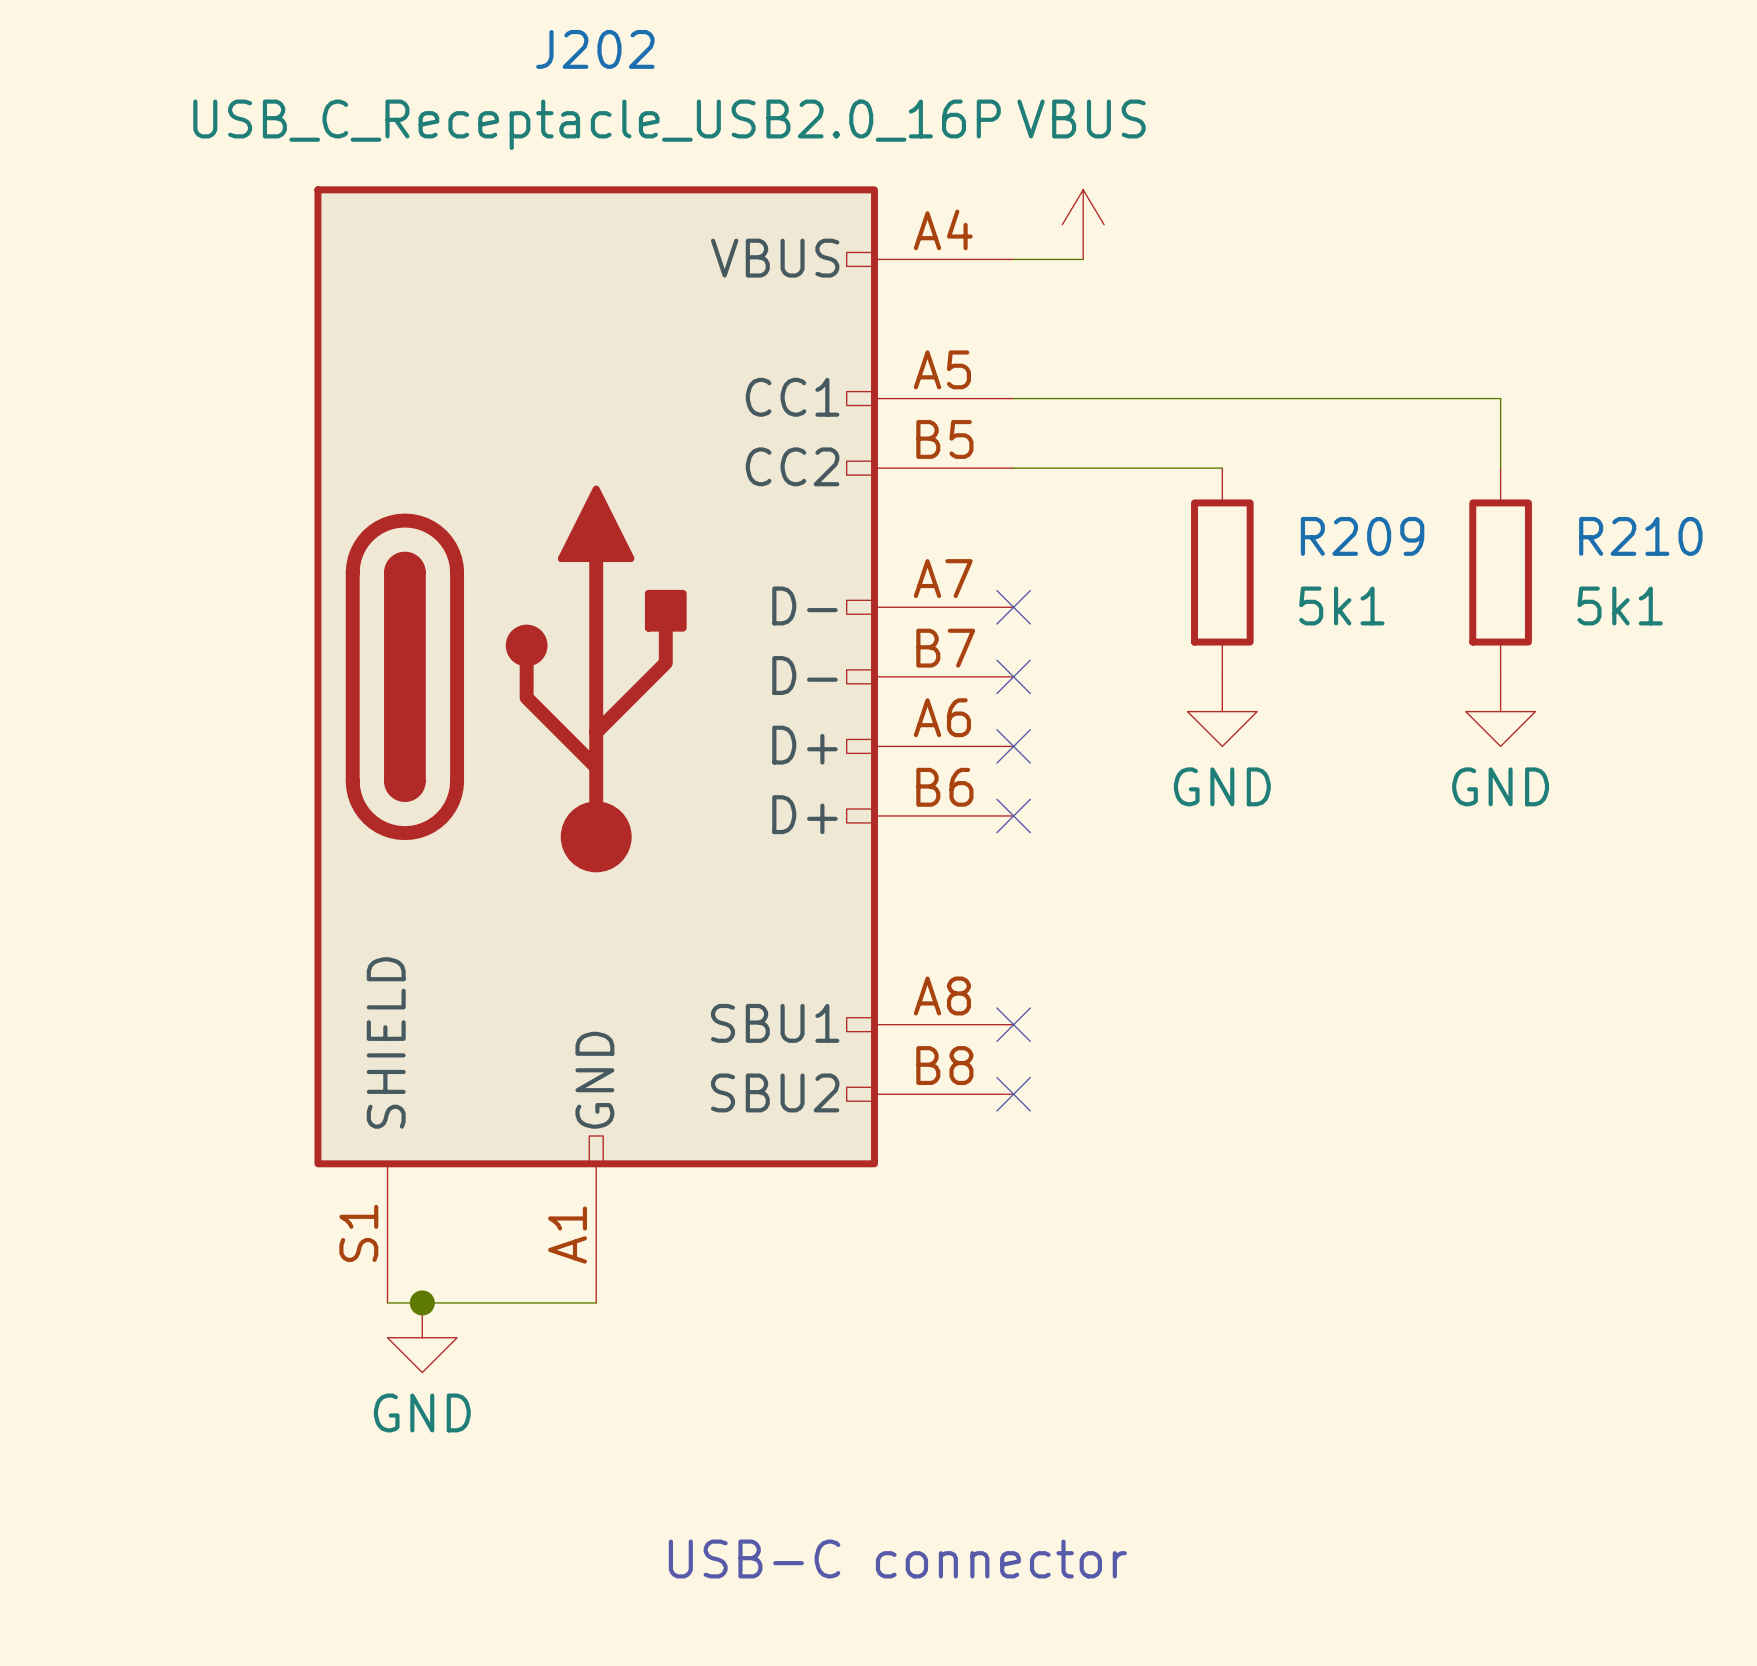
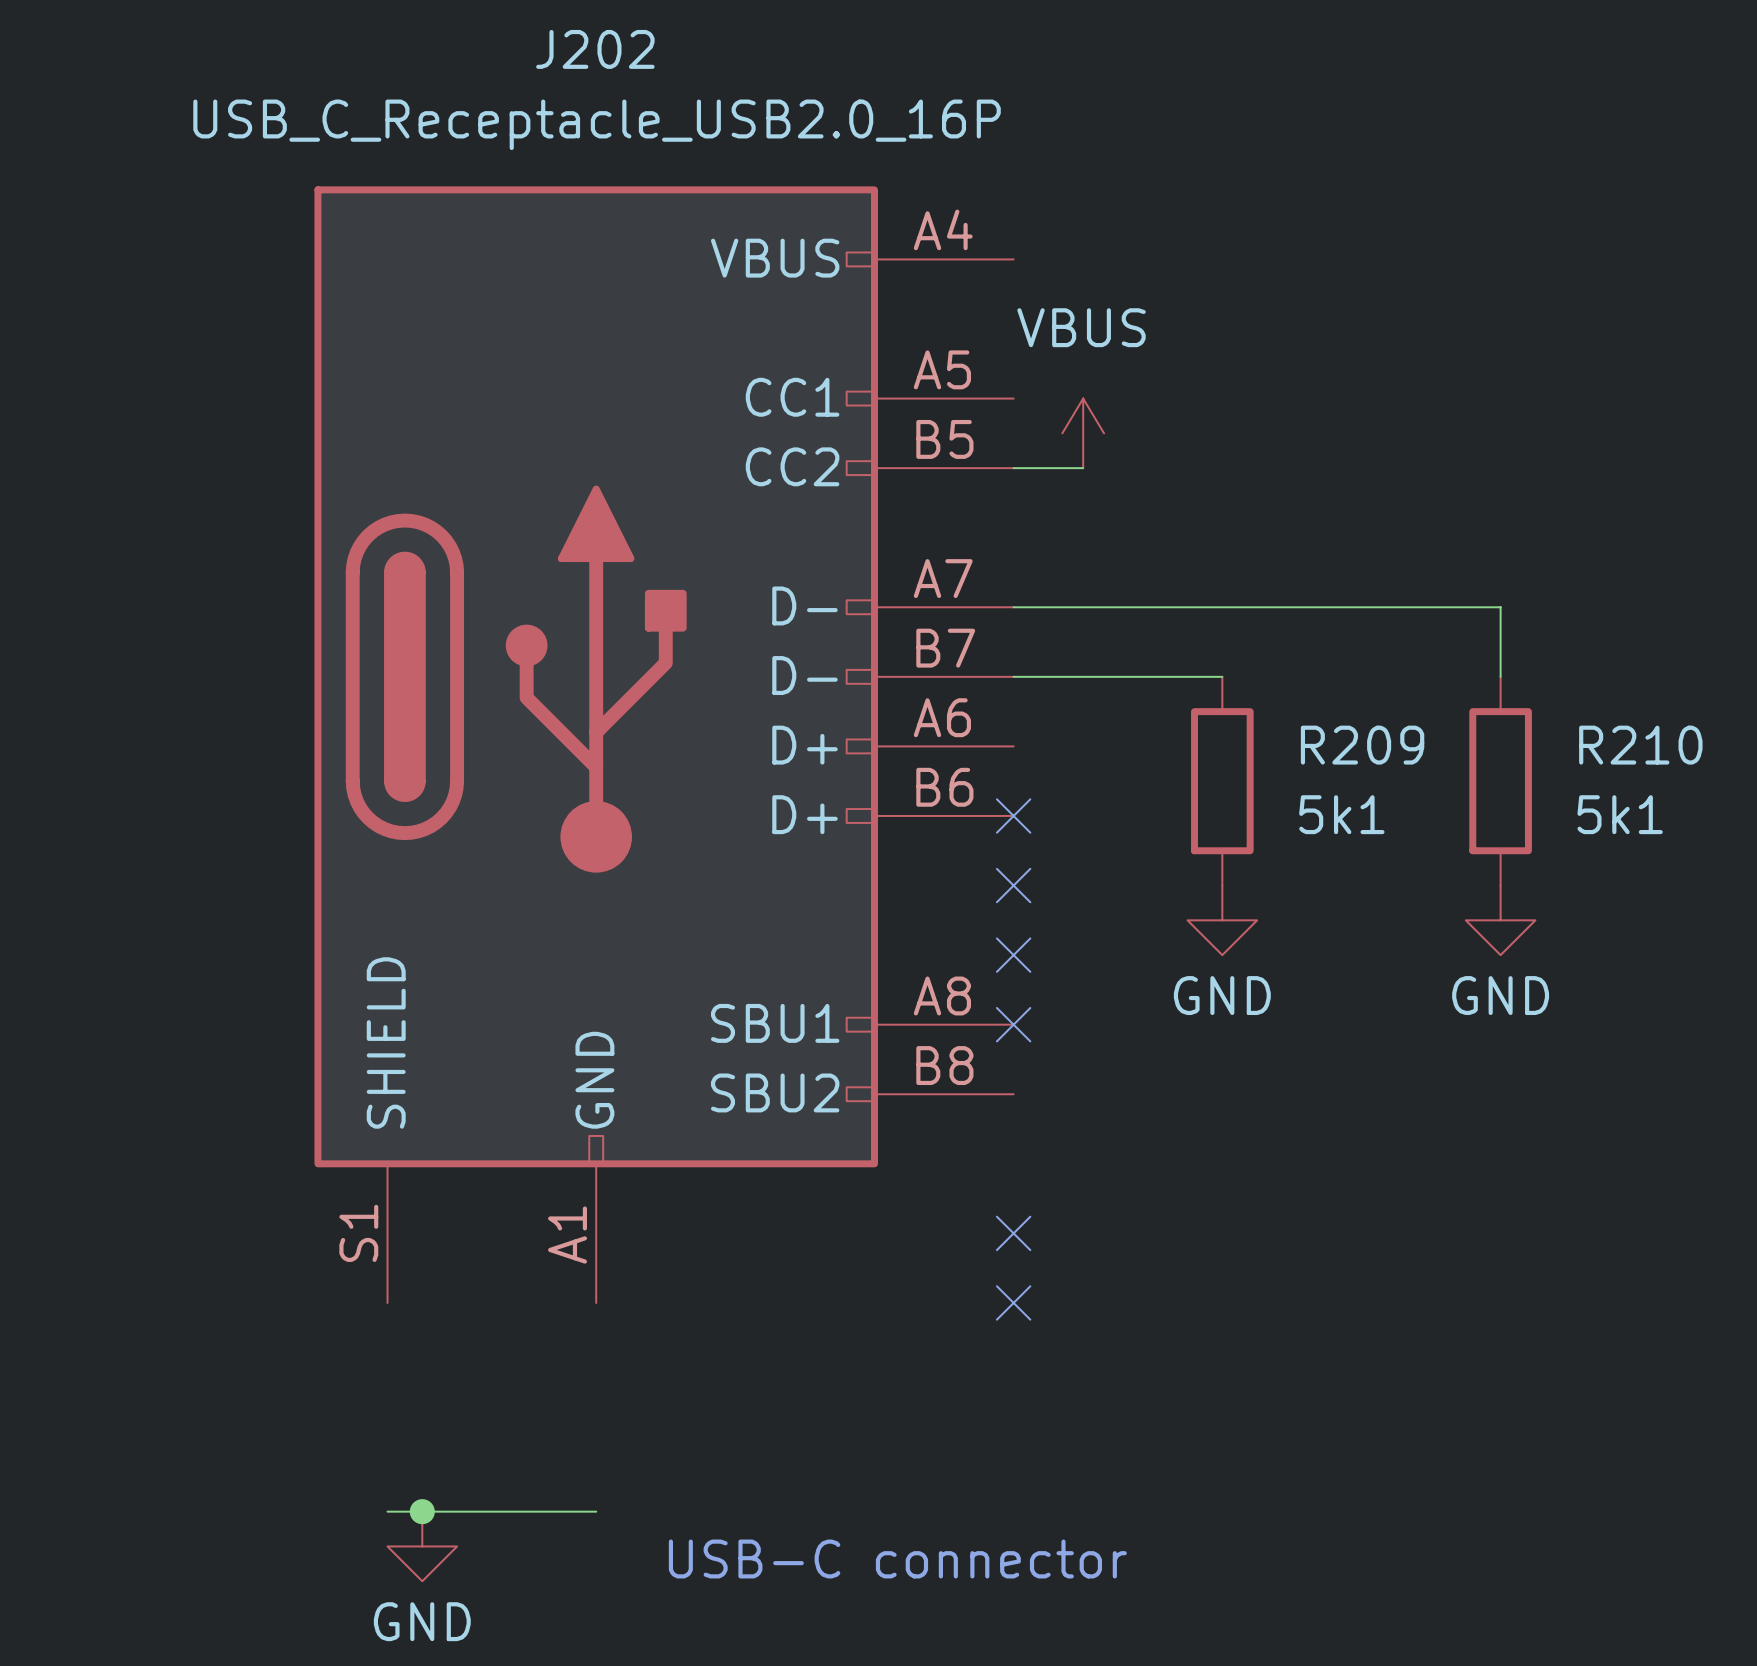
power symbol position: VBUS (1083, 224) -> VBUS (1083, 433)
wire: (1013, 259) (1083, 259) -> none
wire: (1013, 398) (1500, 398) (1500, 468) -> (1013, 607) (1500, 607) (1500, 676)
wire: (1083, 468) (1222, 468) -> none
R209 position: (1222, 572) -> (1222, 781)
R210 position: (1500, 572) -> (1500, 781)
no-connect mark: (1013, 607) -> none
wire: none -> (1013, 676) (1222, 676)
no-connect mark: (1013, 676) -> none
power symbol: GND (1222, 711) -> none
power symbol: GND (1500, 711) -> none
no-connect mark: (1013, 746) -> none
no-connect mark: none -> (1013, 885)
power symbol: none -> GND (1222, 920)
power symbol: none -> GND (1500, 920)
no-connect mark: none -> (1013, 955)
no-connect mark: (1013, 1094) -> none
no-connect mark: none -> (1013, 1233)
wire: (387, 1302) (596, 1302) -> (387, 1511) (596, 1511)
junction: (422, 1302) -> none
no-connect mark: none -> (1013, 1302)
power symbol position: GND (422, 1337) -> GND (422, 1546)
junction: none -> (422, 1511)

